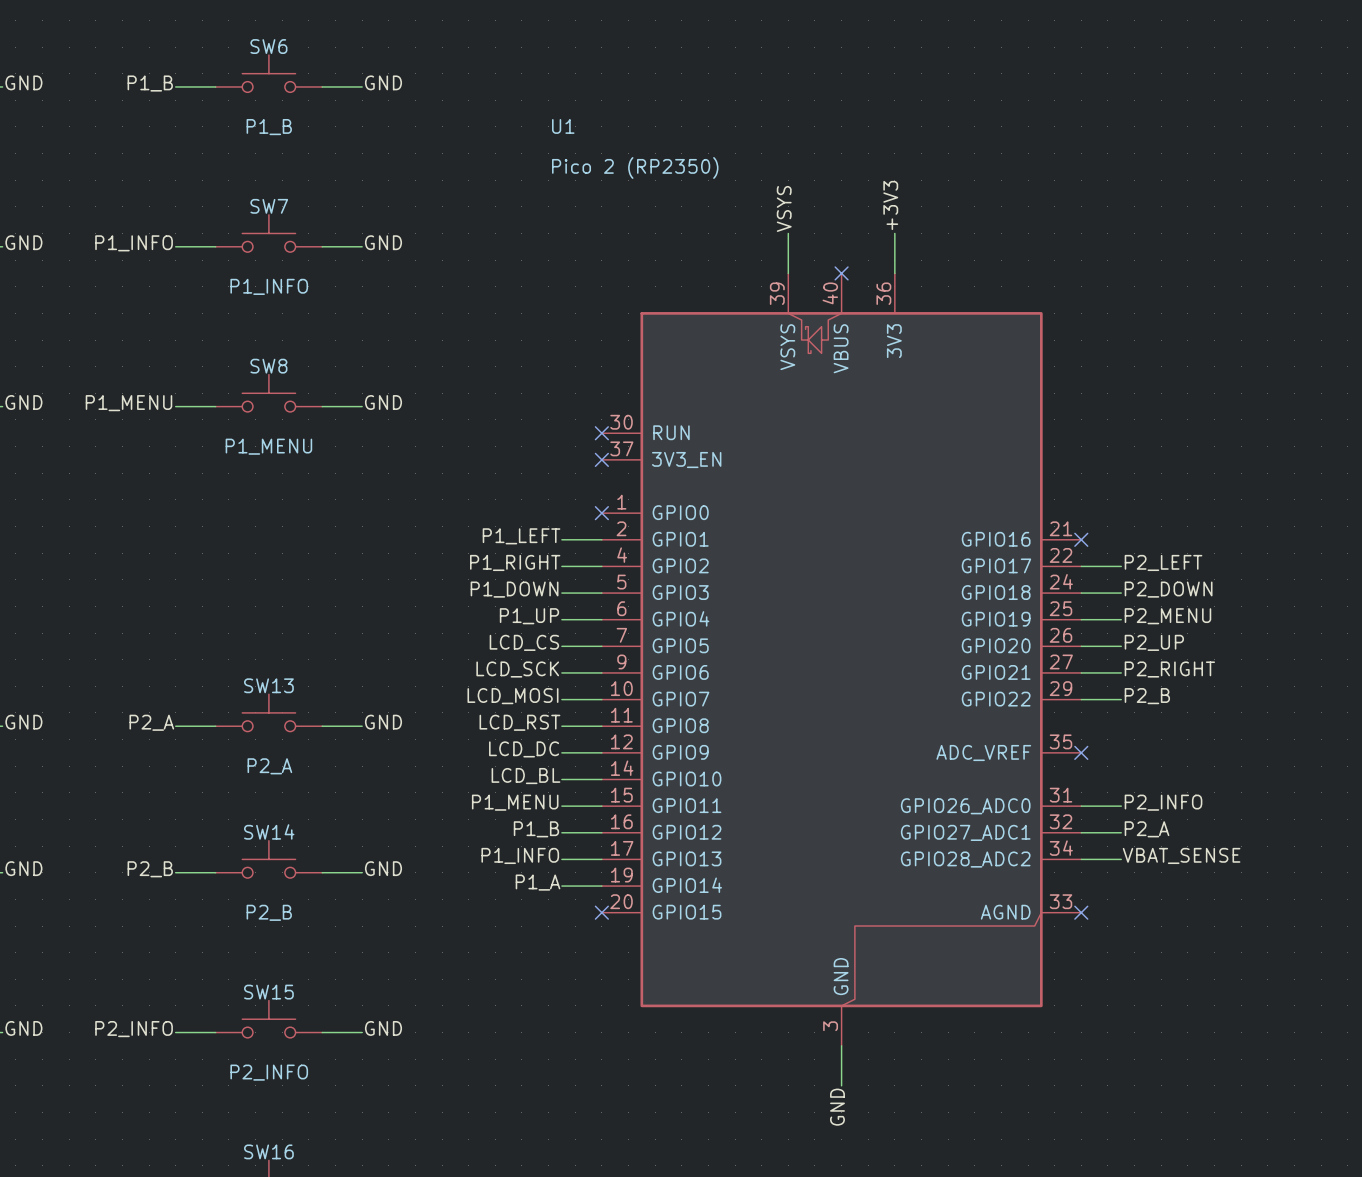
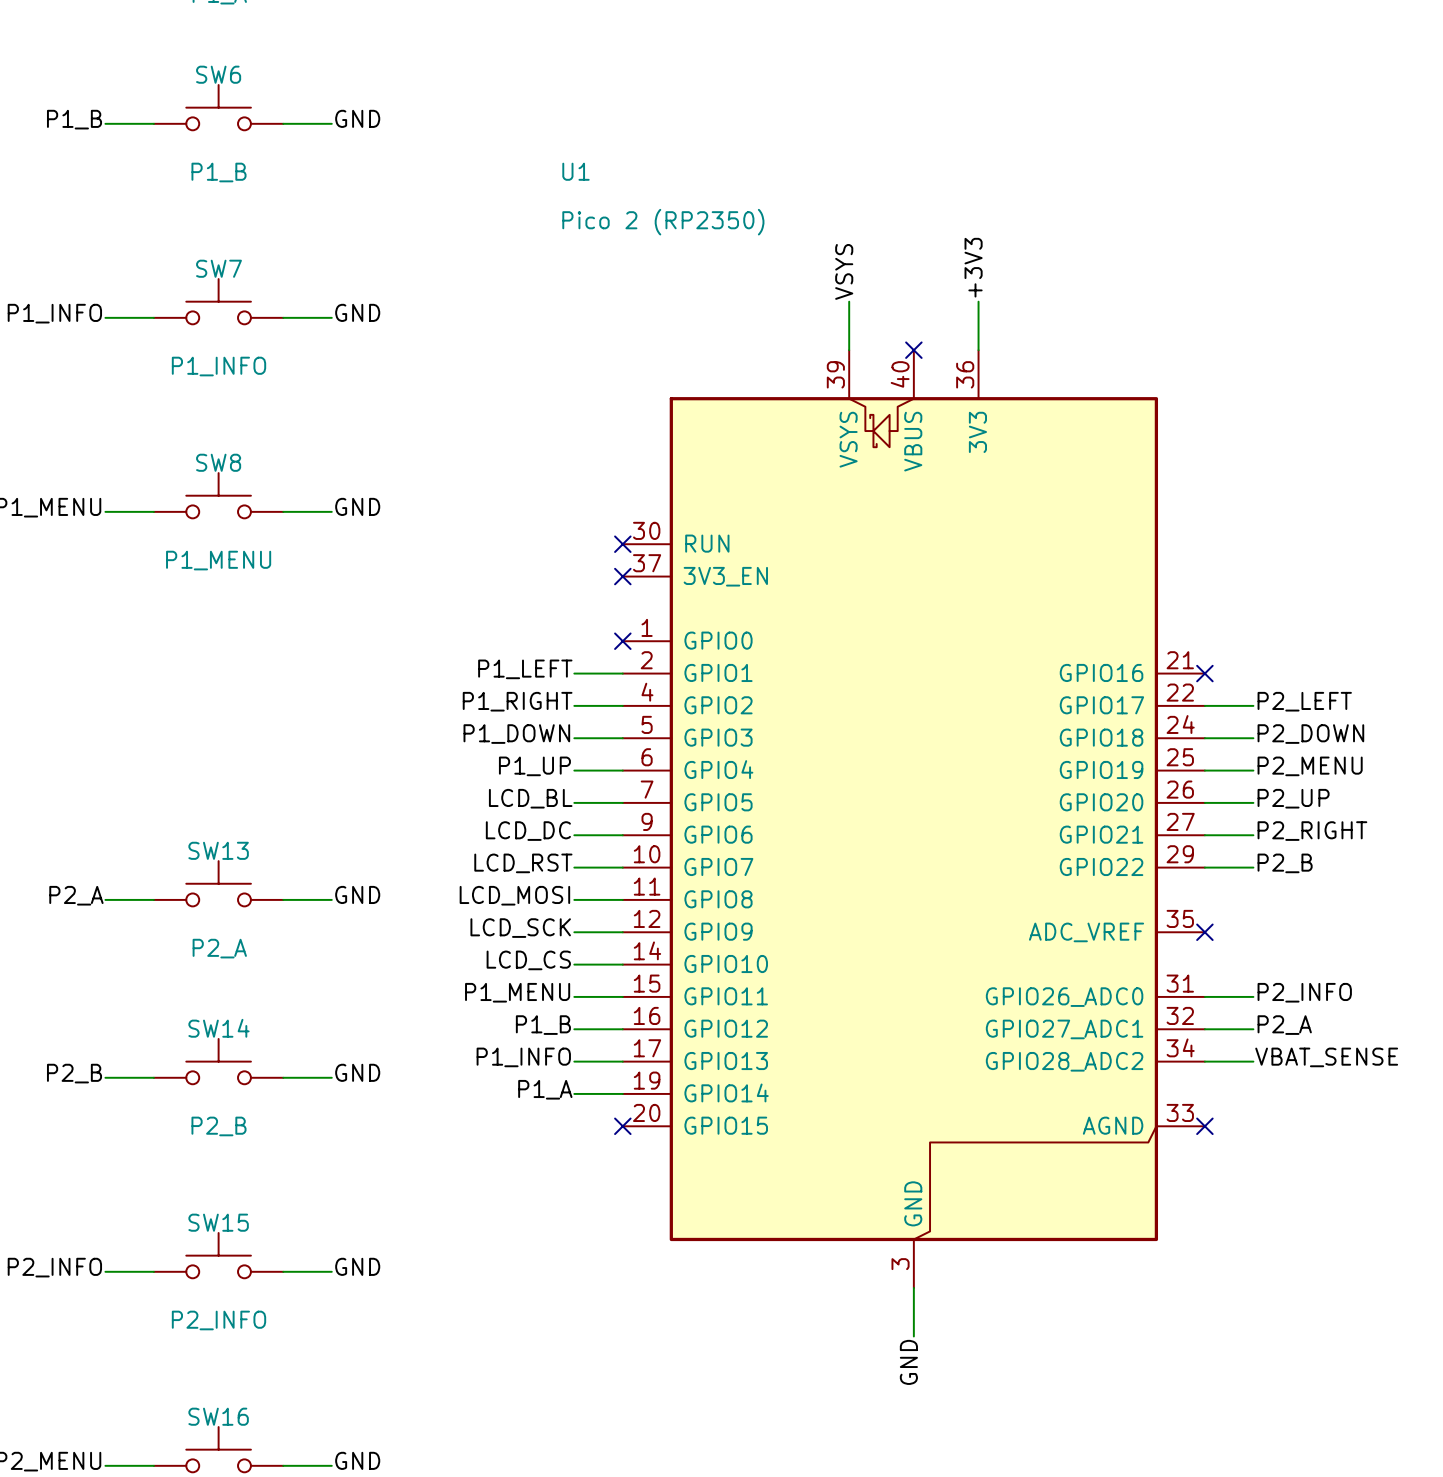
label: LCD_CS (524, 642) -> LCD_BL (530, 798)
label: LCD_SCK (517, 669) -> LCD_DC (528, 831)
label: LCD_MOSI (512, 696) -> LCD_RST (523, 863)
label: LCD_RST (519, 722) -> LCD_MOSI (514, 895)
label: LCD_DC (524, 749) -> LCD_SCK (520, 928)
label: LCD_BL (525, 776) -> LCD_CS (528, 960)

